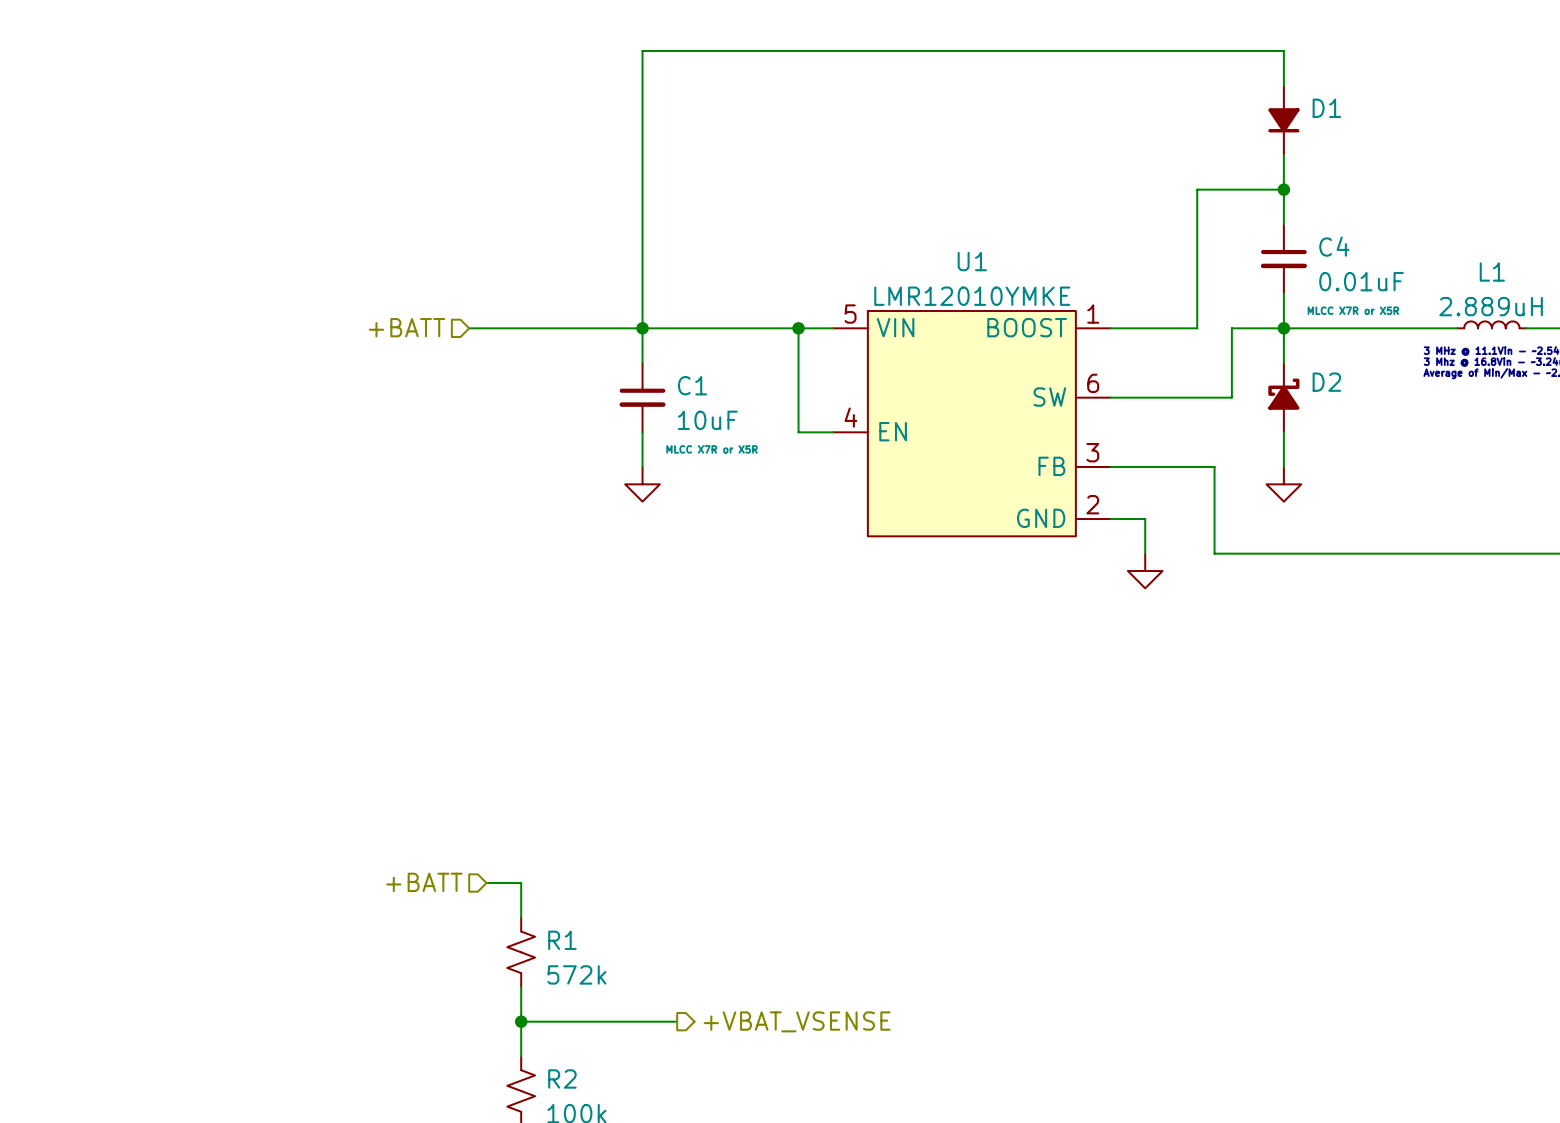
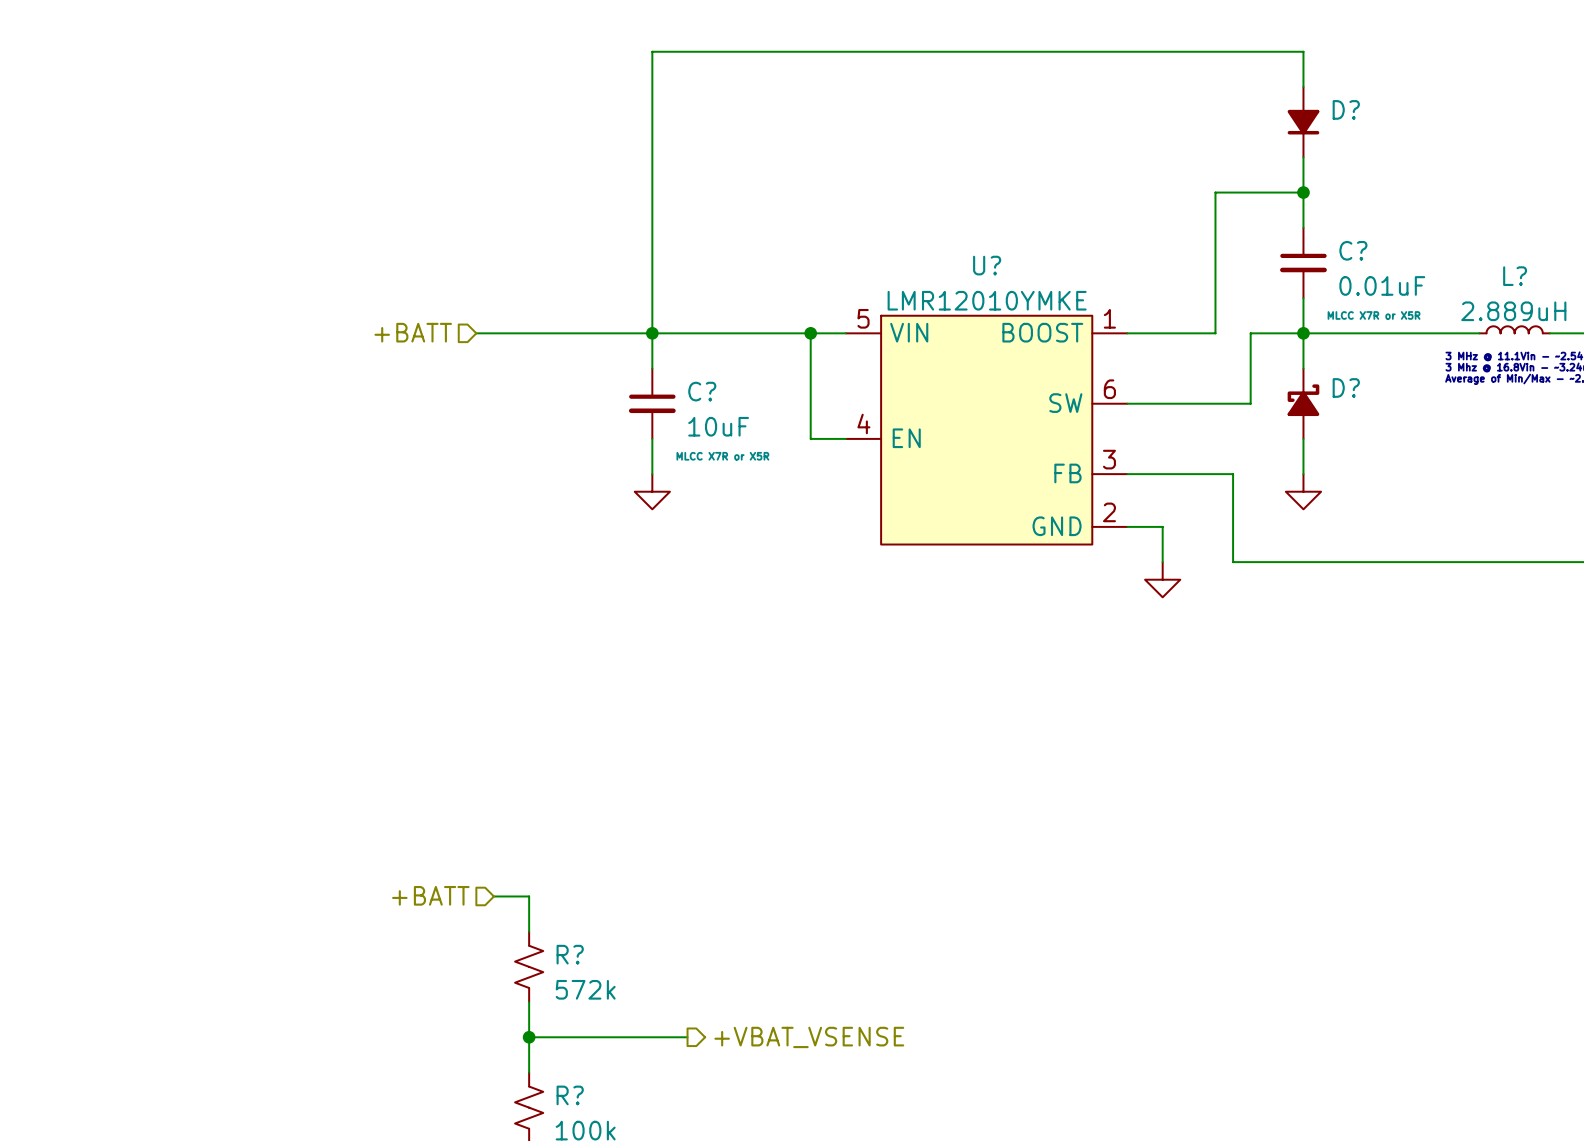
D1 name: D1 (1326, 108) -> D? (1346, 109)
C4 name: C4 (1334, 246) -> C? (1353, 250)
U1 name: U1 (972, 261) -> U? (987, 265)
L1 name: L1 (1492, 271) -> L? (1515, 276)
D2 name: D2 (1326, 382) -> D? (1346, 387)
C1 name: C1 (692, 385) -> C? (702, 391)
R1 name: R1 (562, 940) -> R? (570, 954)
R2 name: R2 (562, 1078) -> R? (570, 1095)

